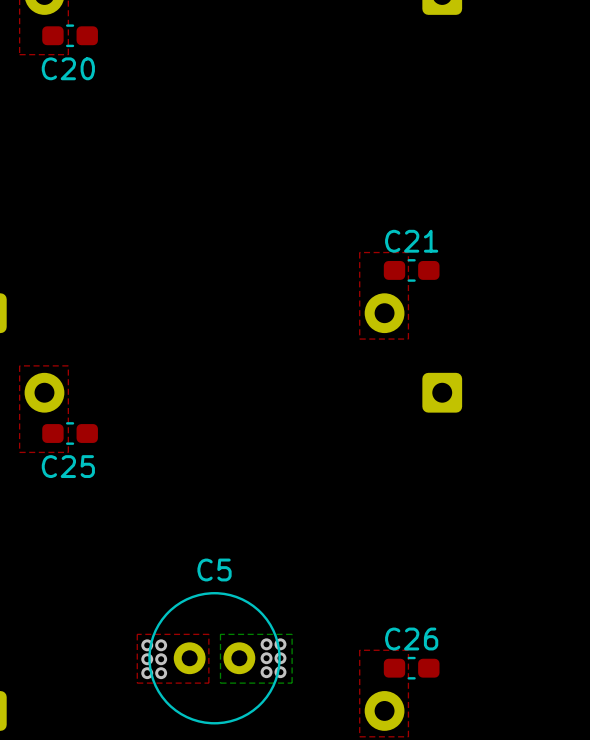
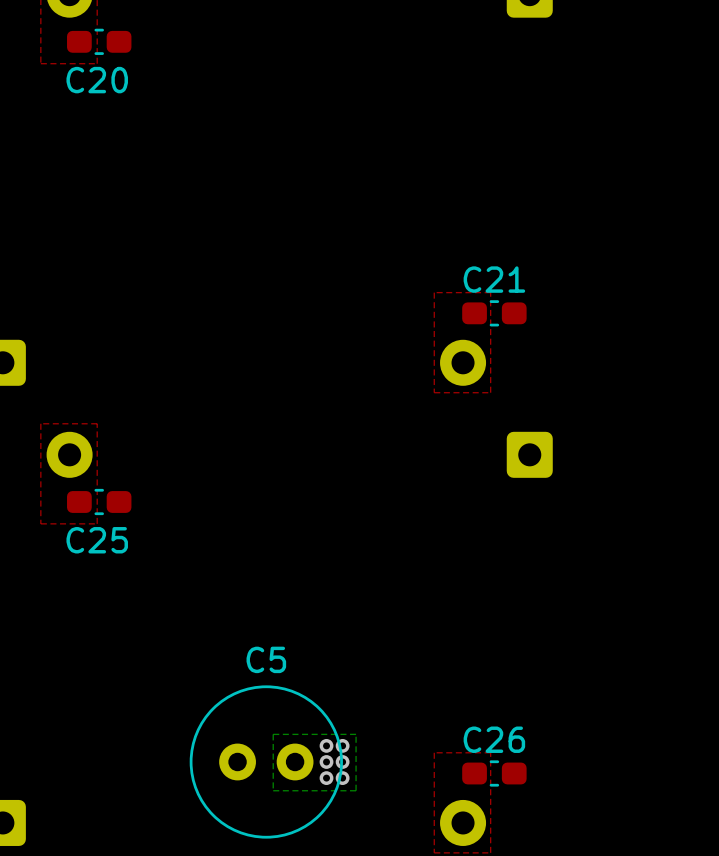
top zone outline: (137, 634) (208, 634) (208, 683) (137, 683) (137, 634) -> none
via: (147, 645) -> none
via: (161, 645) -> none
via: (147, 659) -> none
via: (161, 659) -> none
via: (147, 673) -> none
via: (161, 673) -> none

